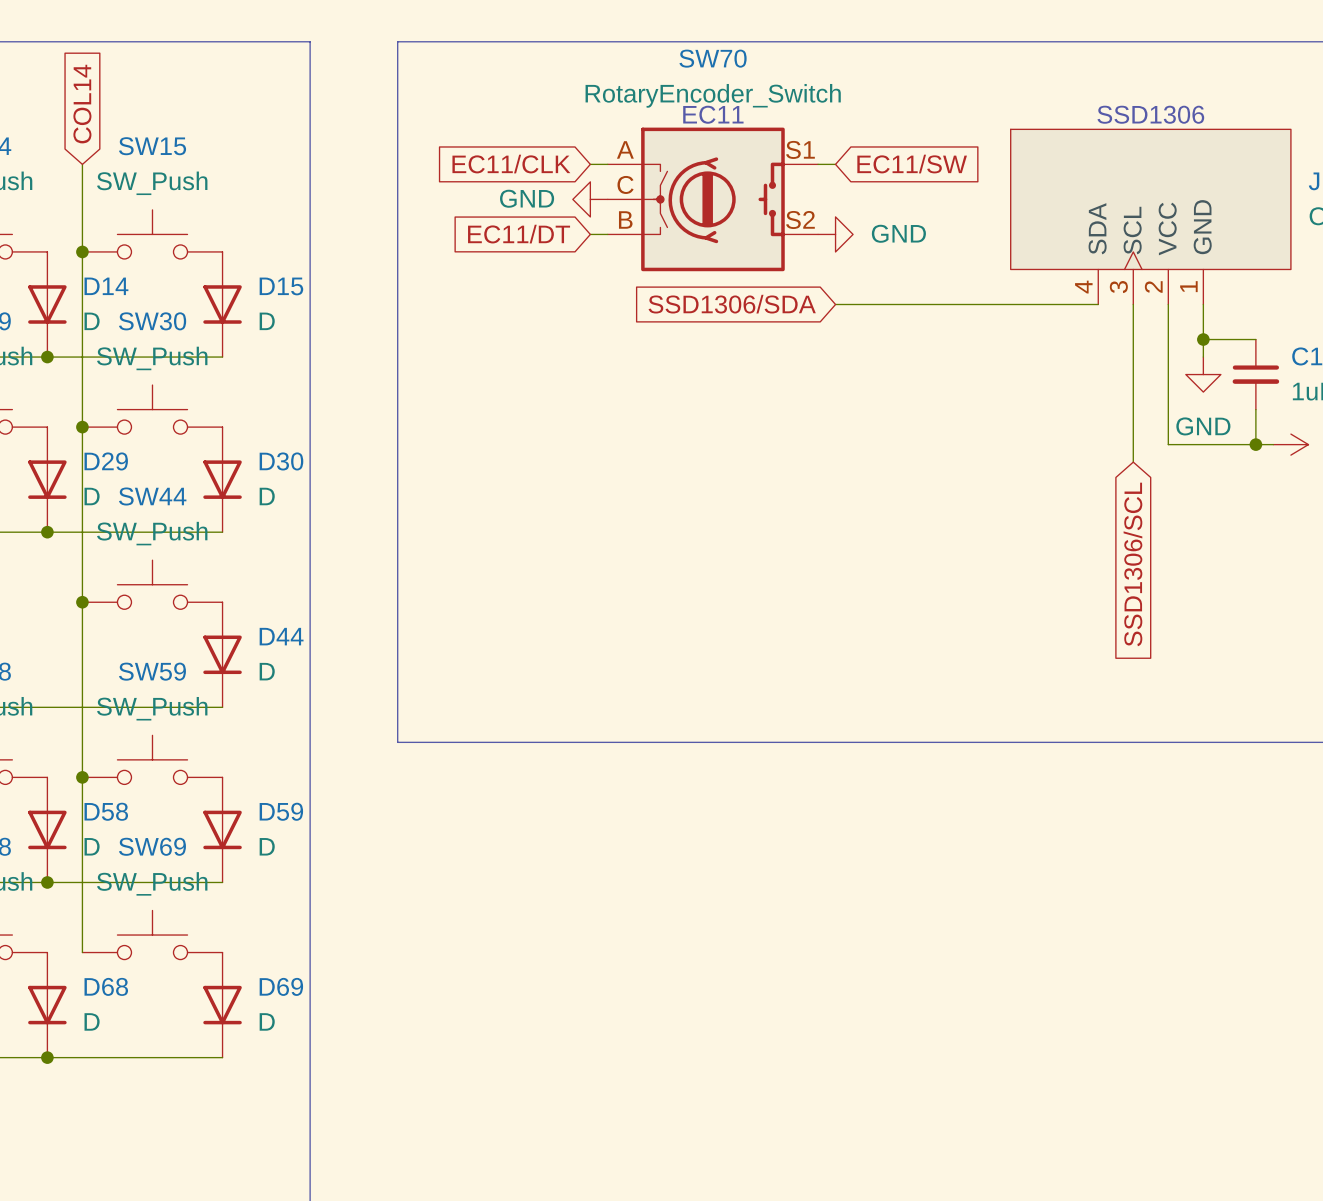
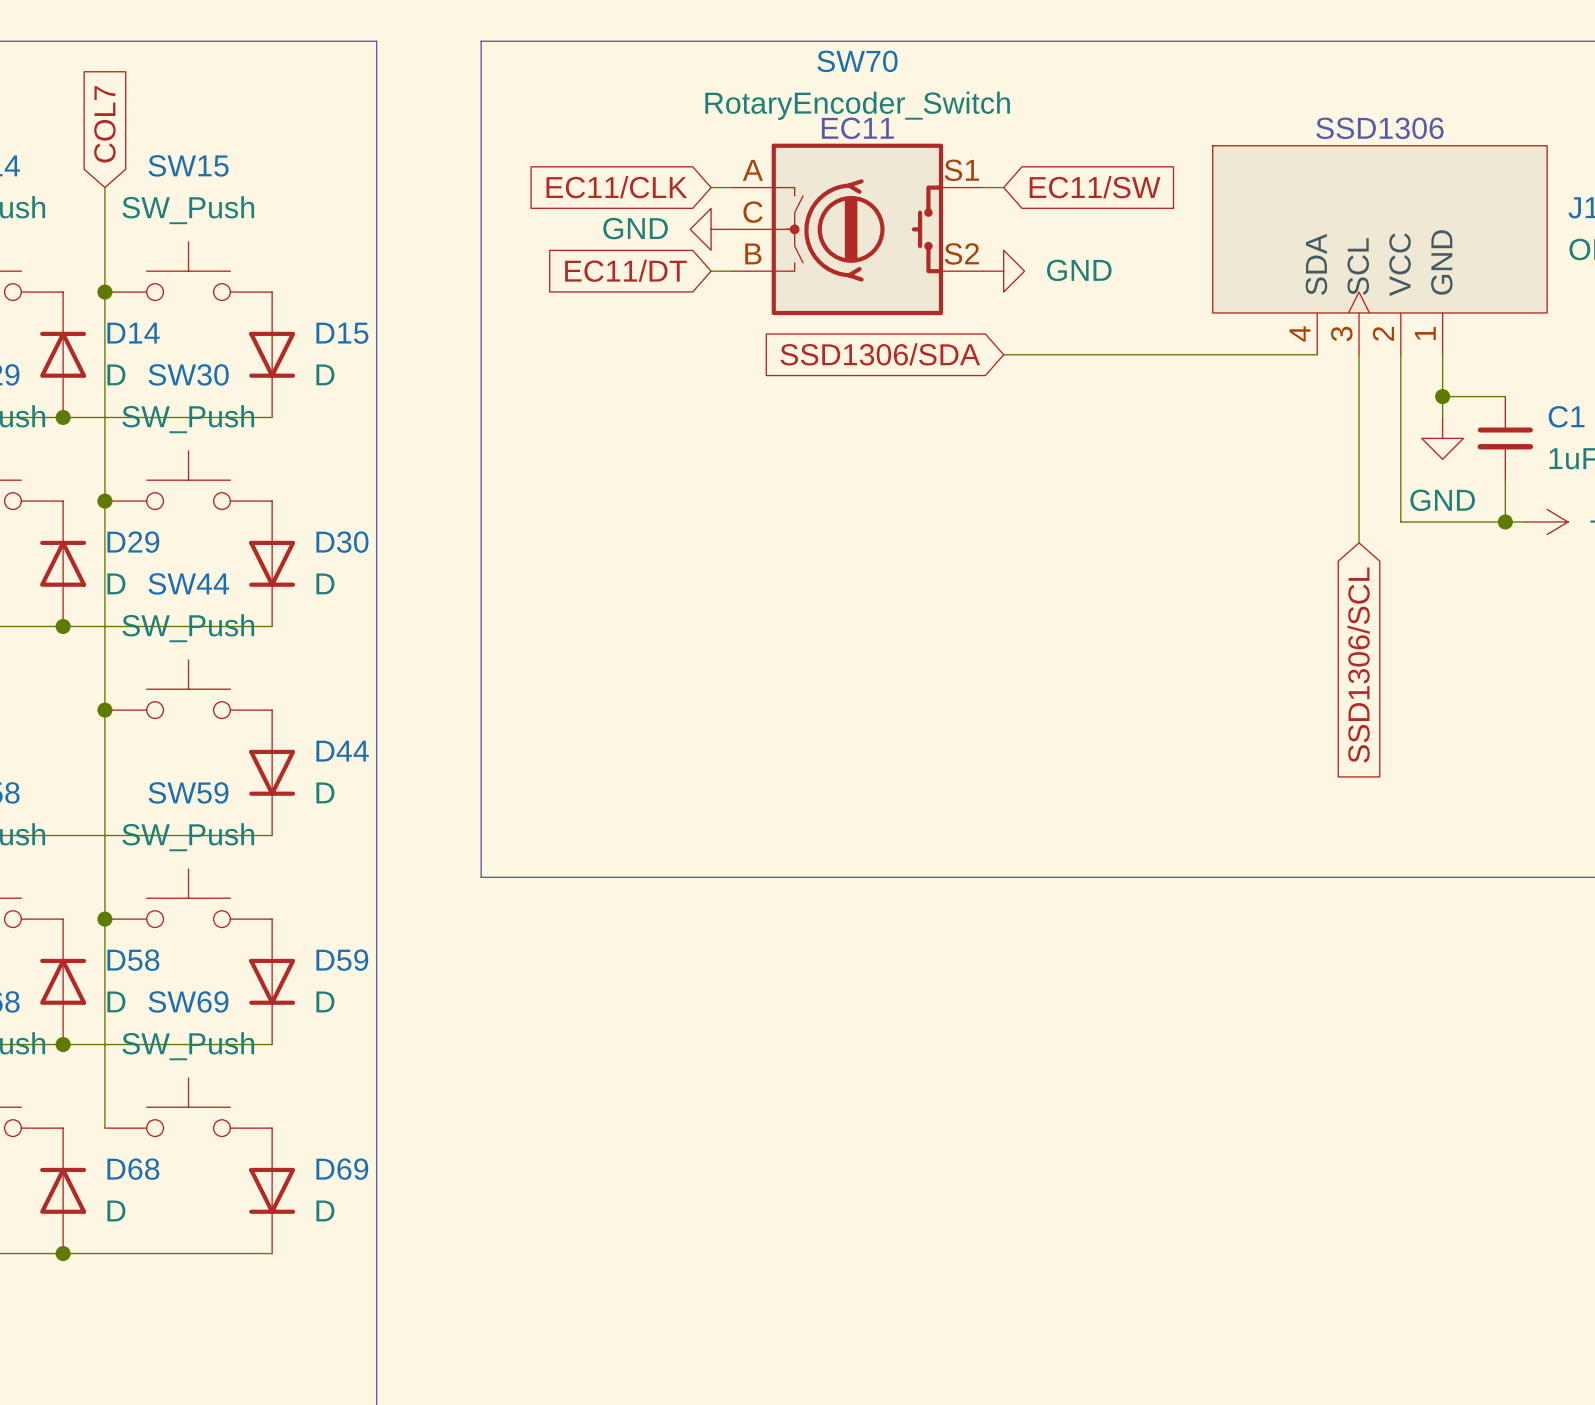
global label: COL14 (82, 104) -> COL7 (104, 124)
D14 rotation: 0° (47, 304) -> 180° (63, 354)
D29 rotation: 0° (47, 479) -> 180° (63, 563)
D58 rotation: 0° (47, 829) -> 180° (63, 981)
D68 rotation: 0° (47, 1005) -> 180° (63, 1190)

